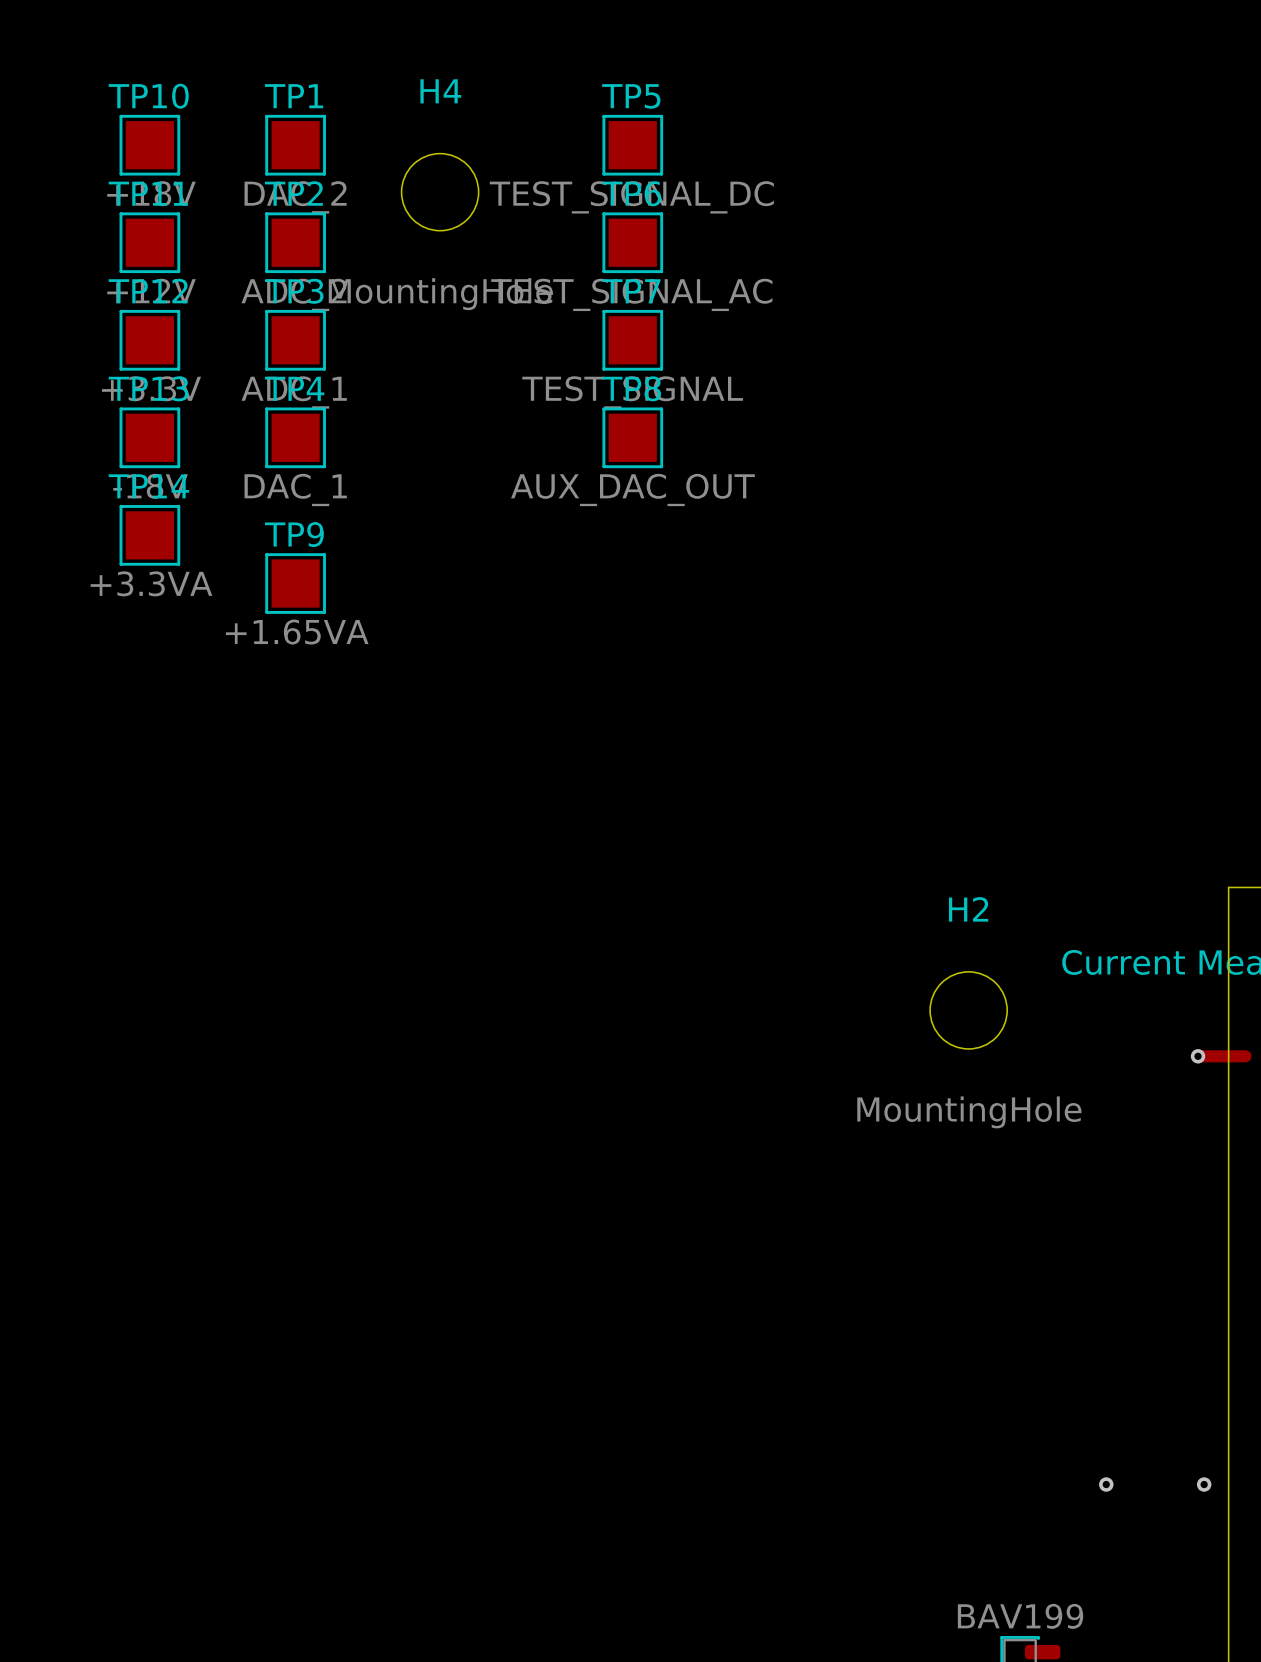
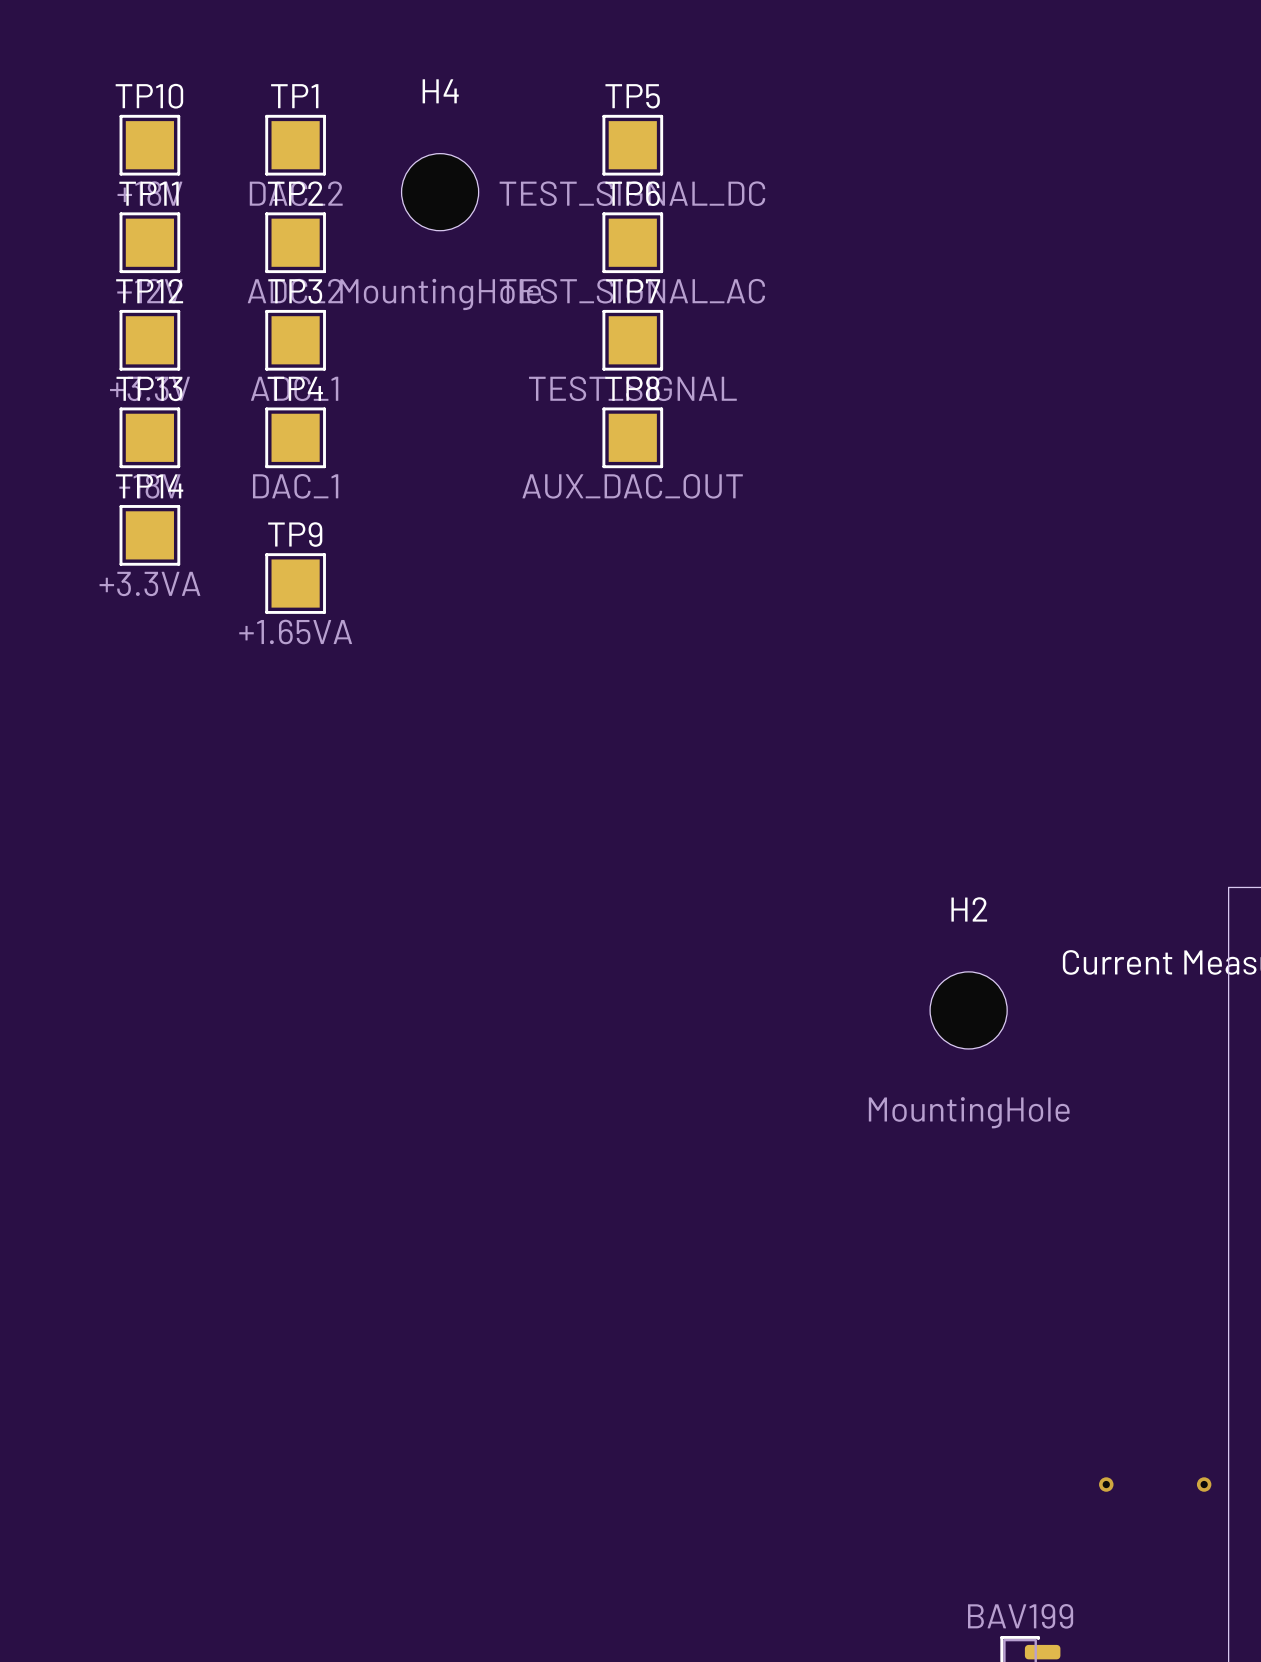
track: (1198, 1056) (1245, 1056) -> none
via: (1198, 1056) -> none

